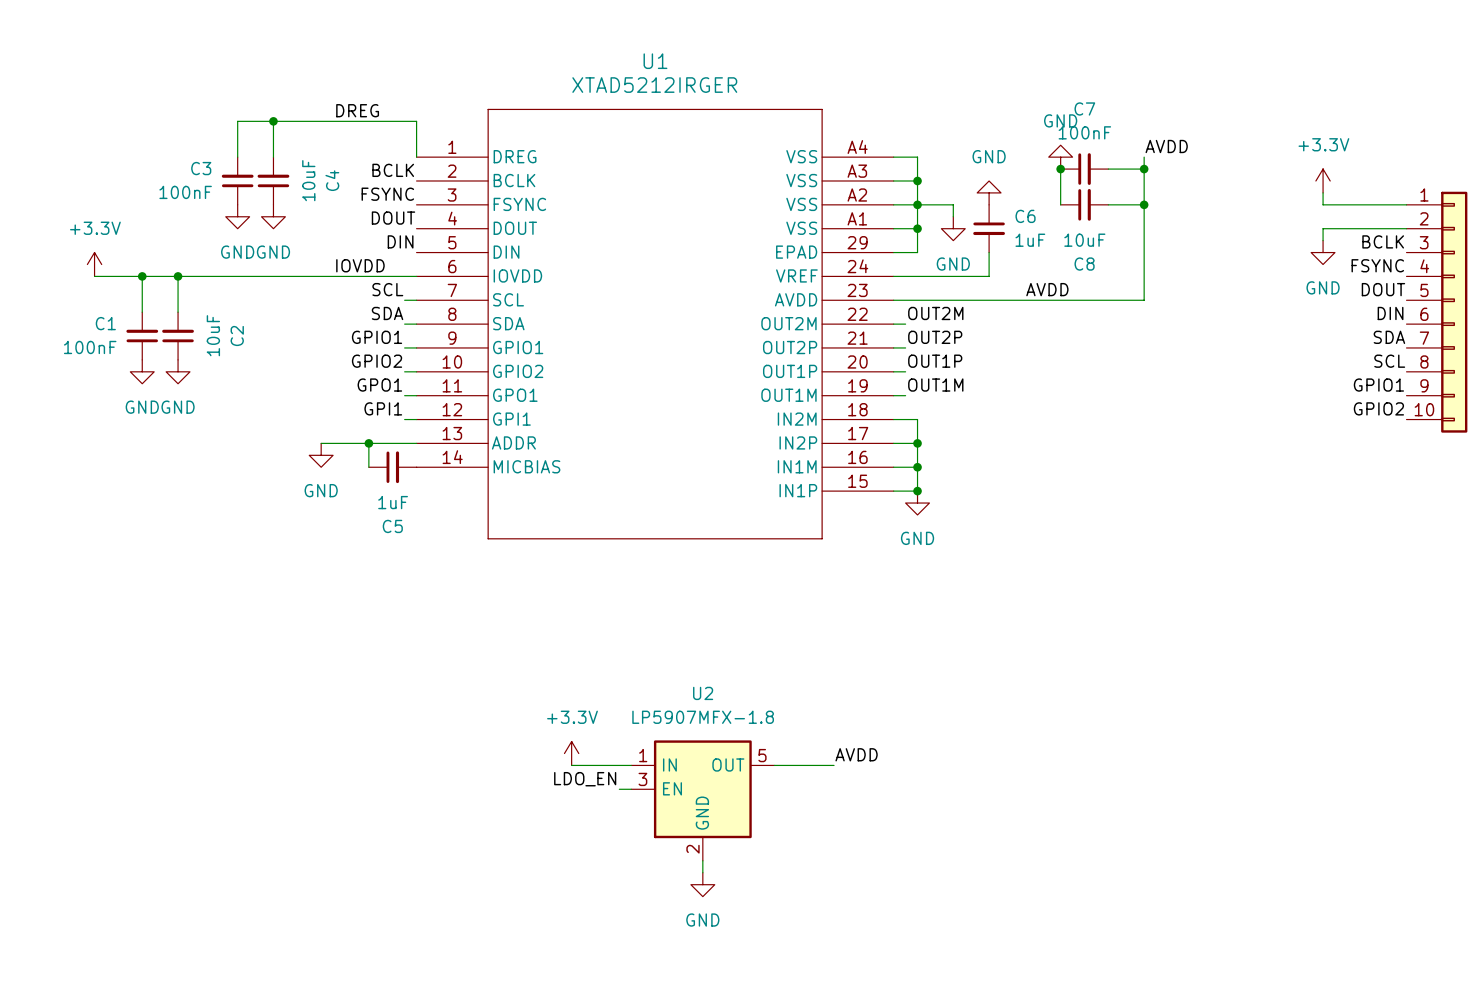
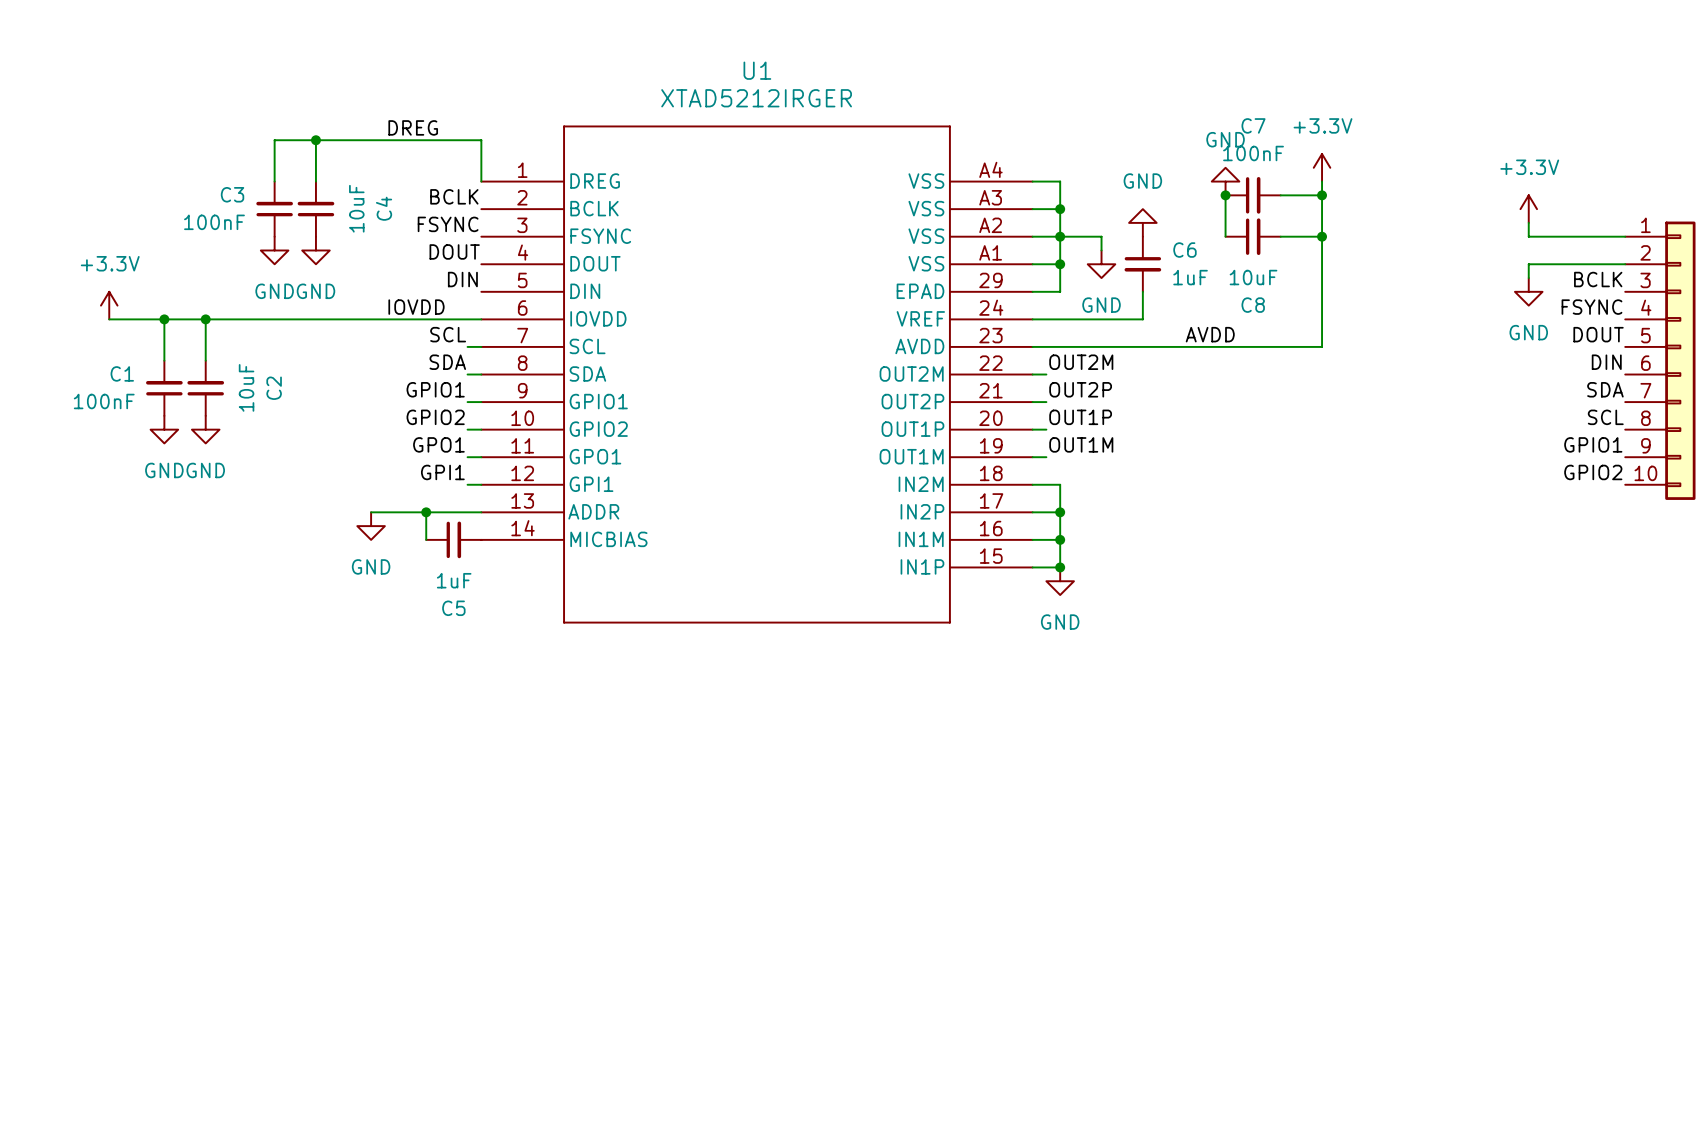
power symbol: none -> +3.3V (1322, 167)
label: AVDD (1166, 146) -> none
power symbol: +3.3V (571, 753) -> none
label: AVDD (856, 754) -> none
wire: (571, 765) (631, 765) -> none
wire: (774, 765) (834, 765) -> none
label: LDO_EN (585, 779) -> none
wire: (619, 789) (631, 789) -> none
U2: LP5907MFX-1.8 (702, 800) -> none
wire: (702, 860) (702, 872) -> none
power symbol: GND (702, 884) -> none

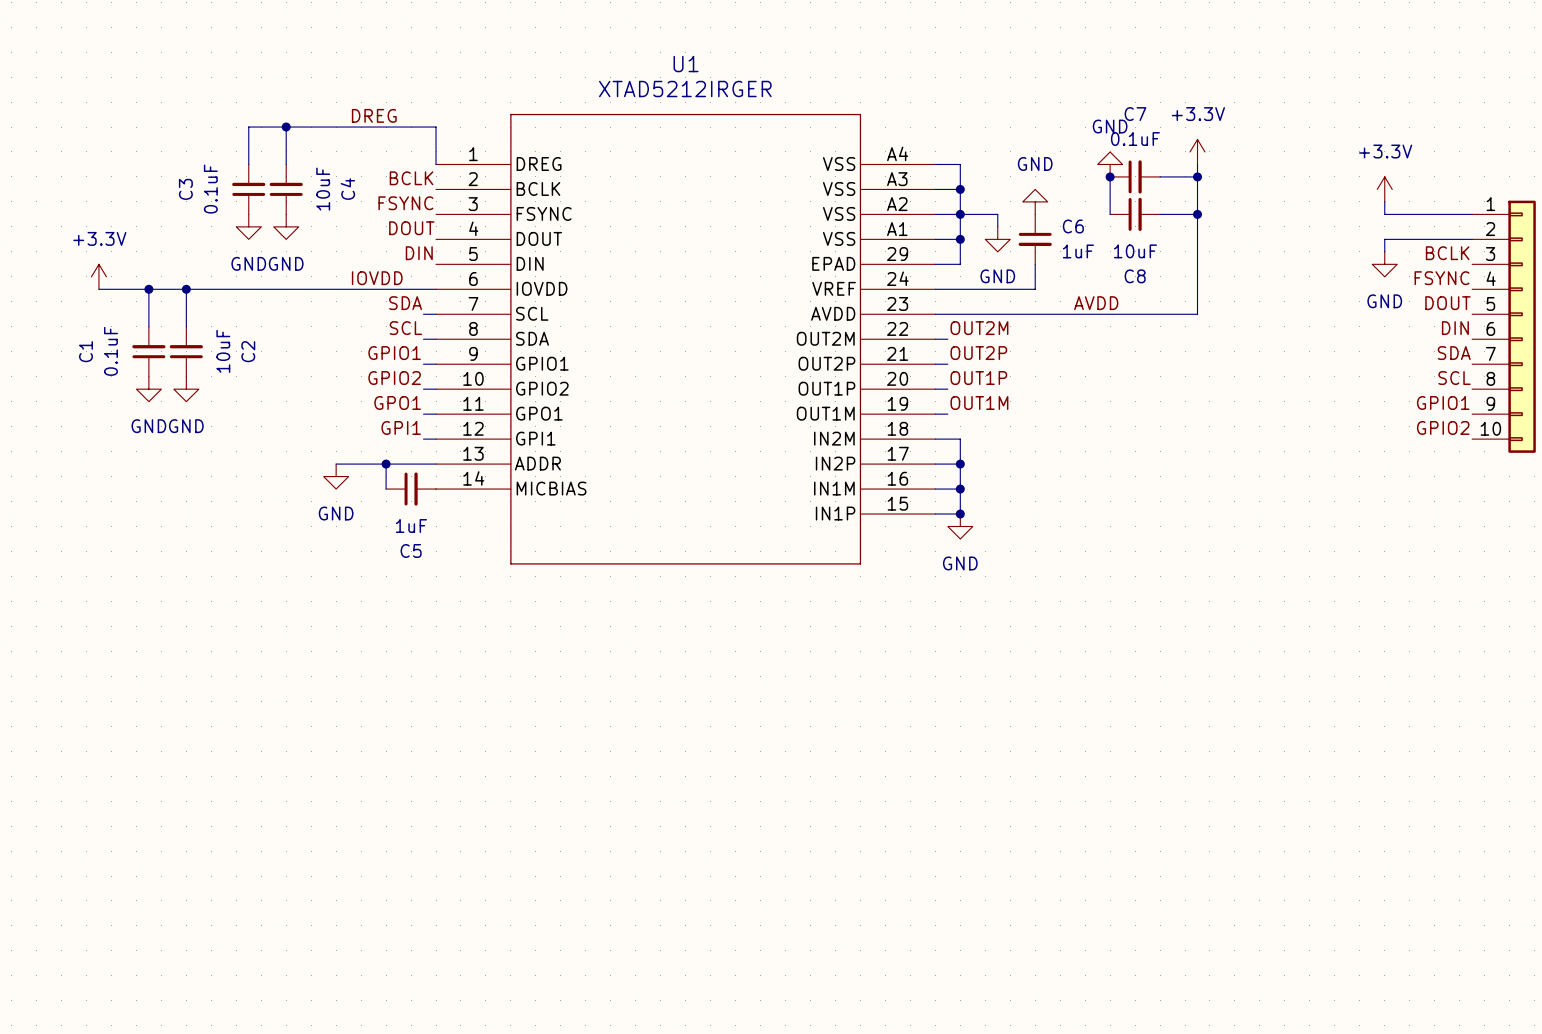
C7 value: 100nF (1253, 153) -> 0.1uF (1135, 139)
C3 name rotation: 0° (232, 194) -> 90° counterclockwise (185, 189)
C3 value: 100nF (214, 222) -> 0.1uF (210, 189)
label: SCL (448, 334) -> SDA (405, 303)
label: SDA (447, 362) -> SCL (405, 328)
C1 name rotation: 0° (122, 373) -> 90° counterclockwise (86, 351)
C1 value: 100nF (104, 401) -> 0.1uF (110, 351)

